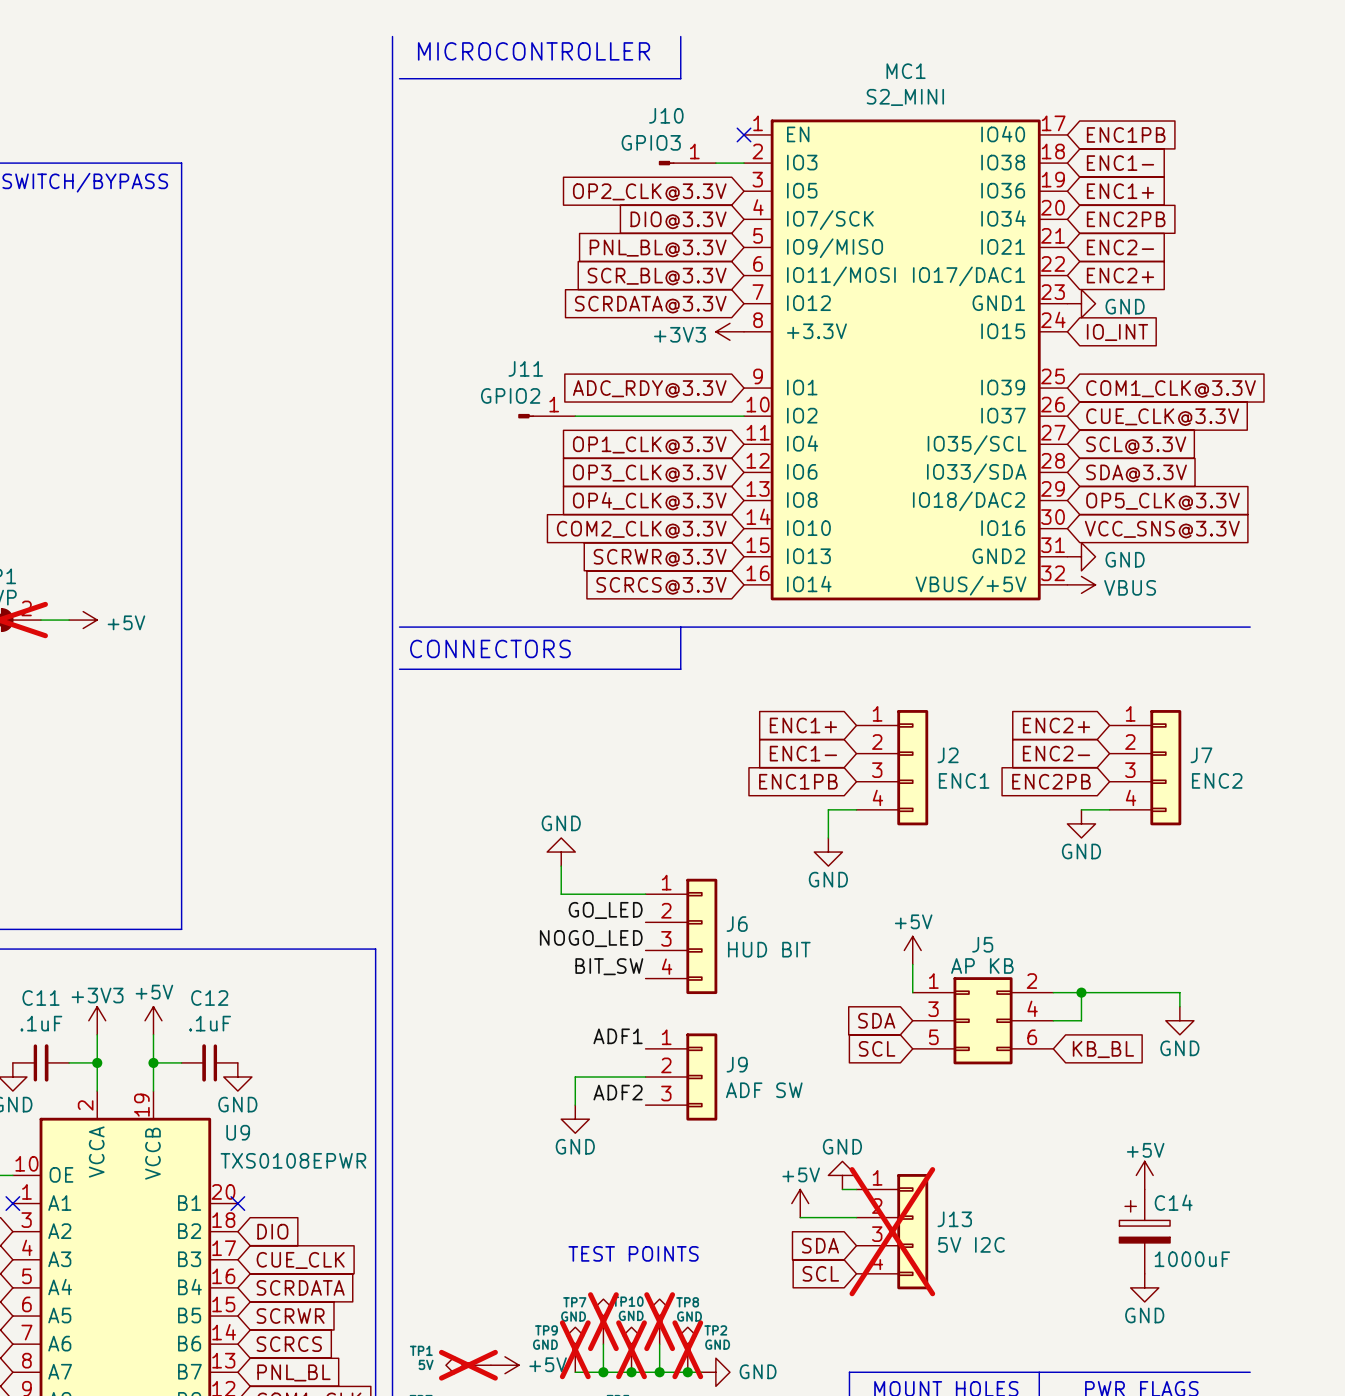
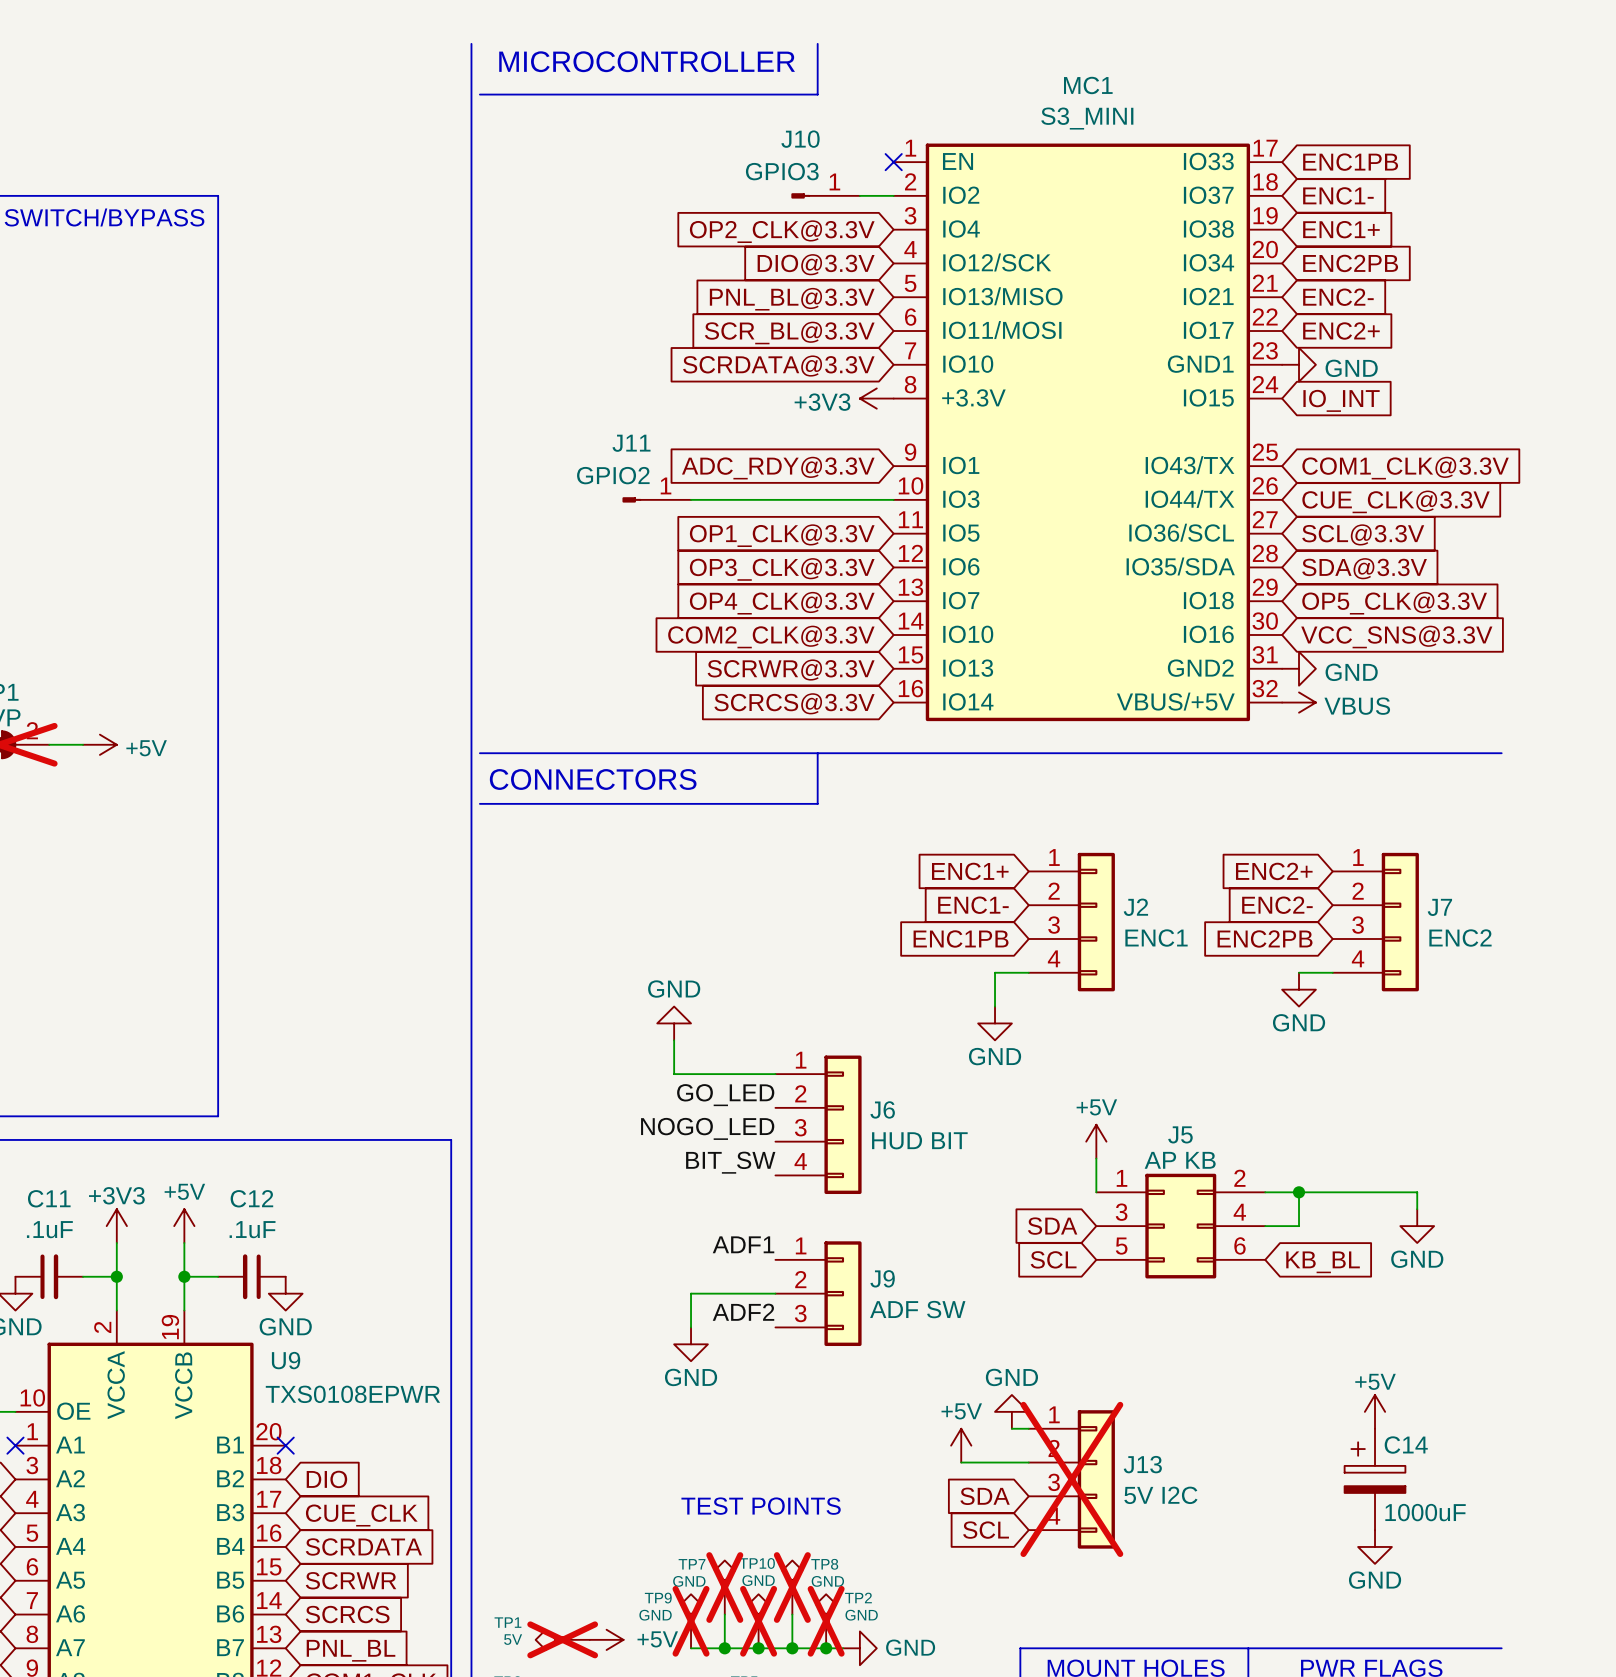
MC1 value: S2_MINI (905, 97) -> S3_MINI (1087, 118)
MC1 symbol: [744, 119, 1068, 601] -> [893, 143, 1283, 722]

